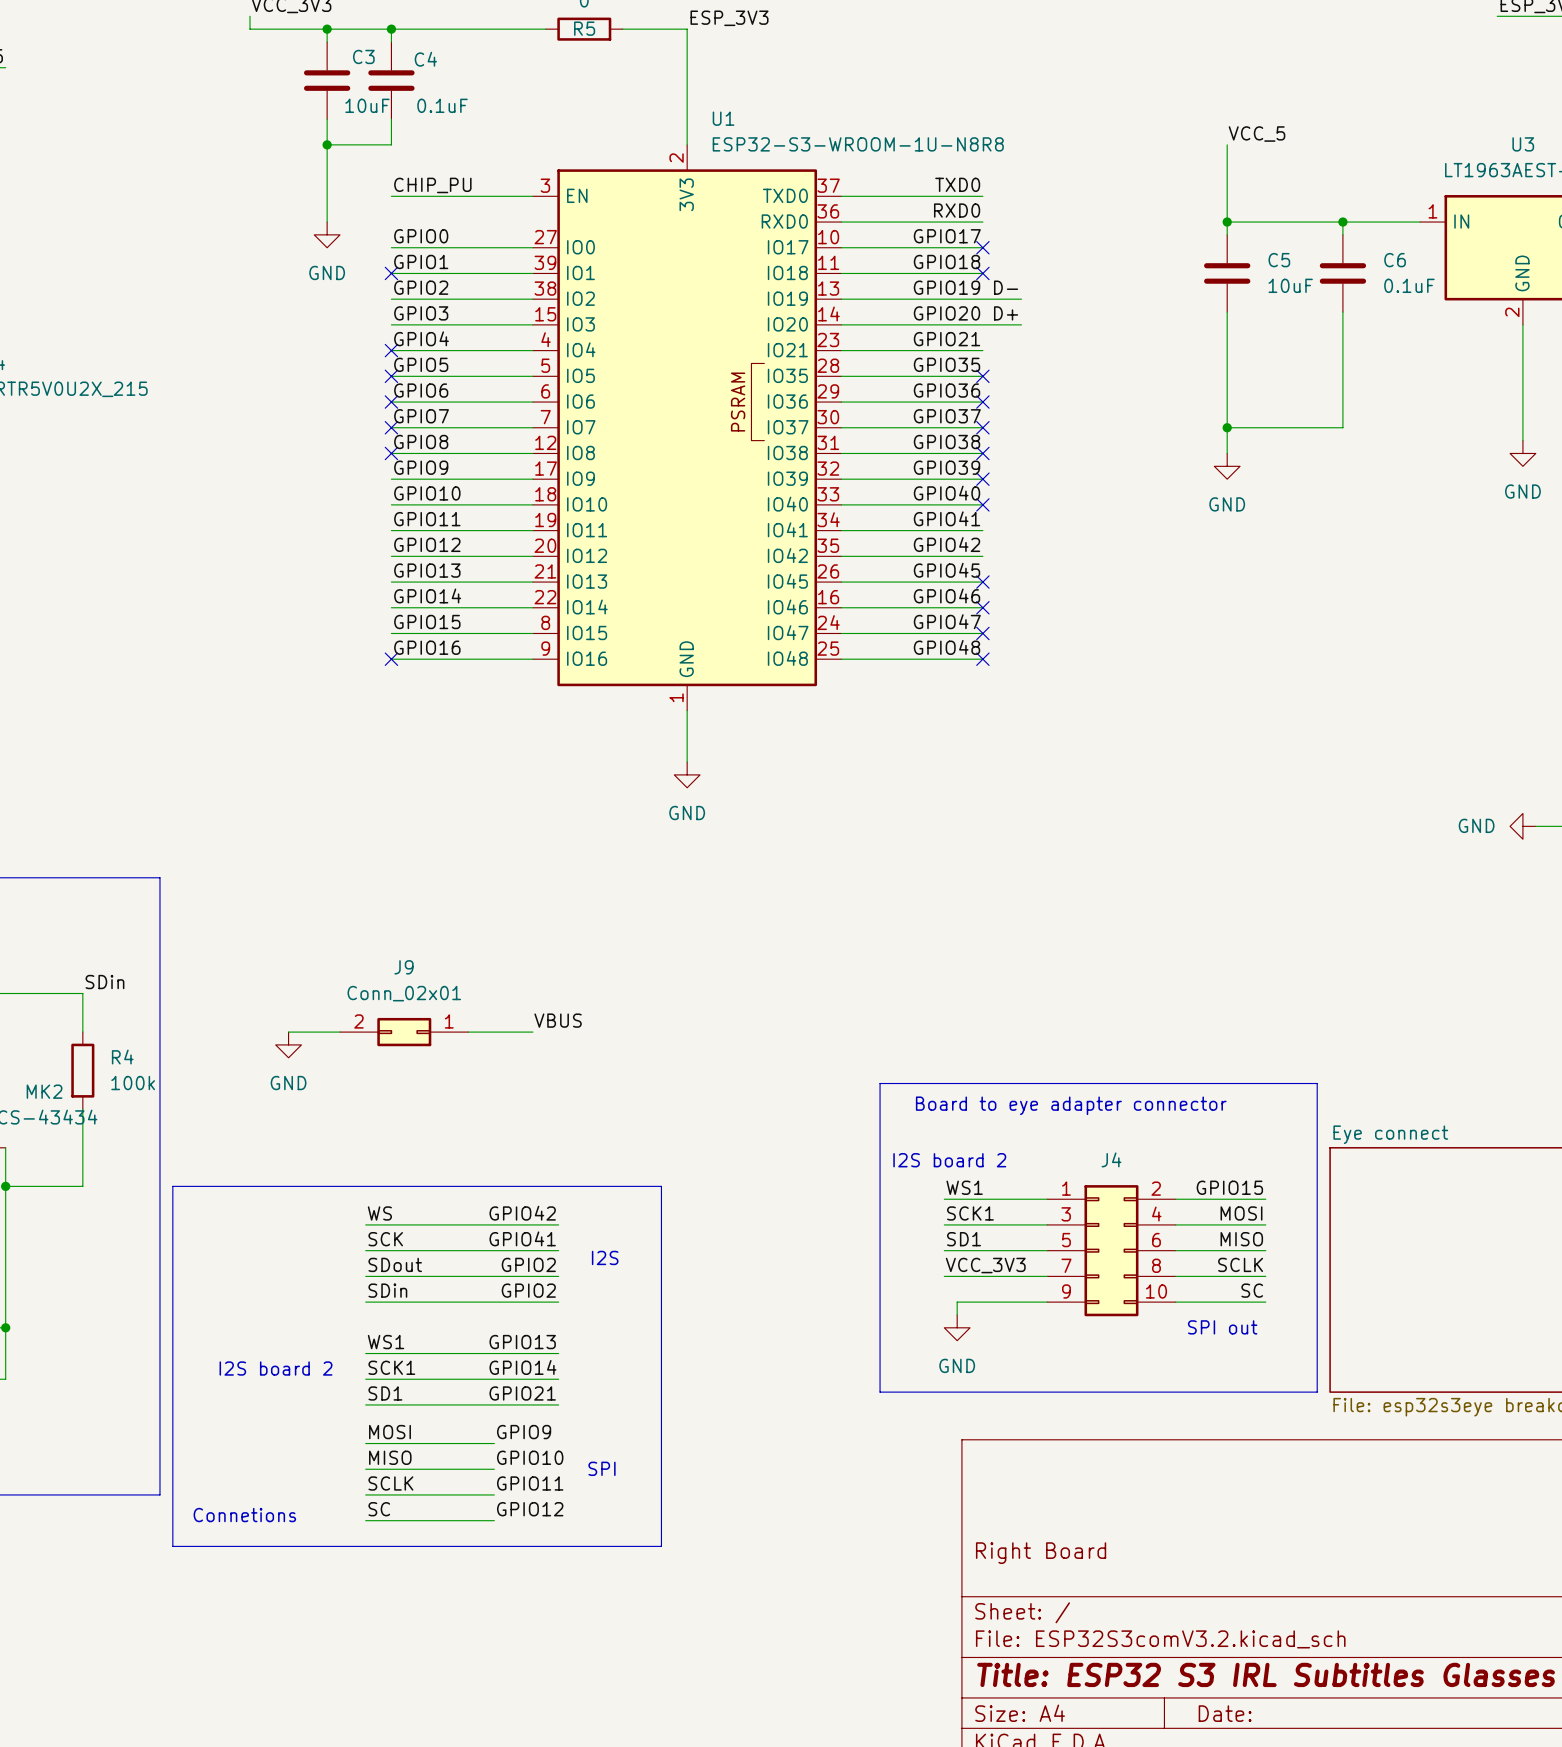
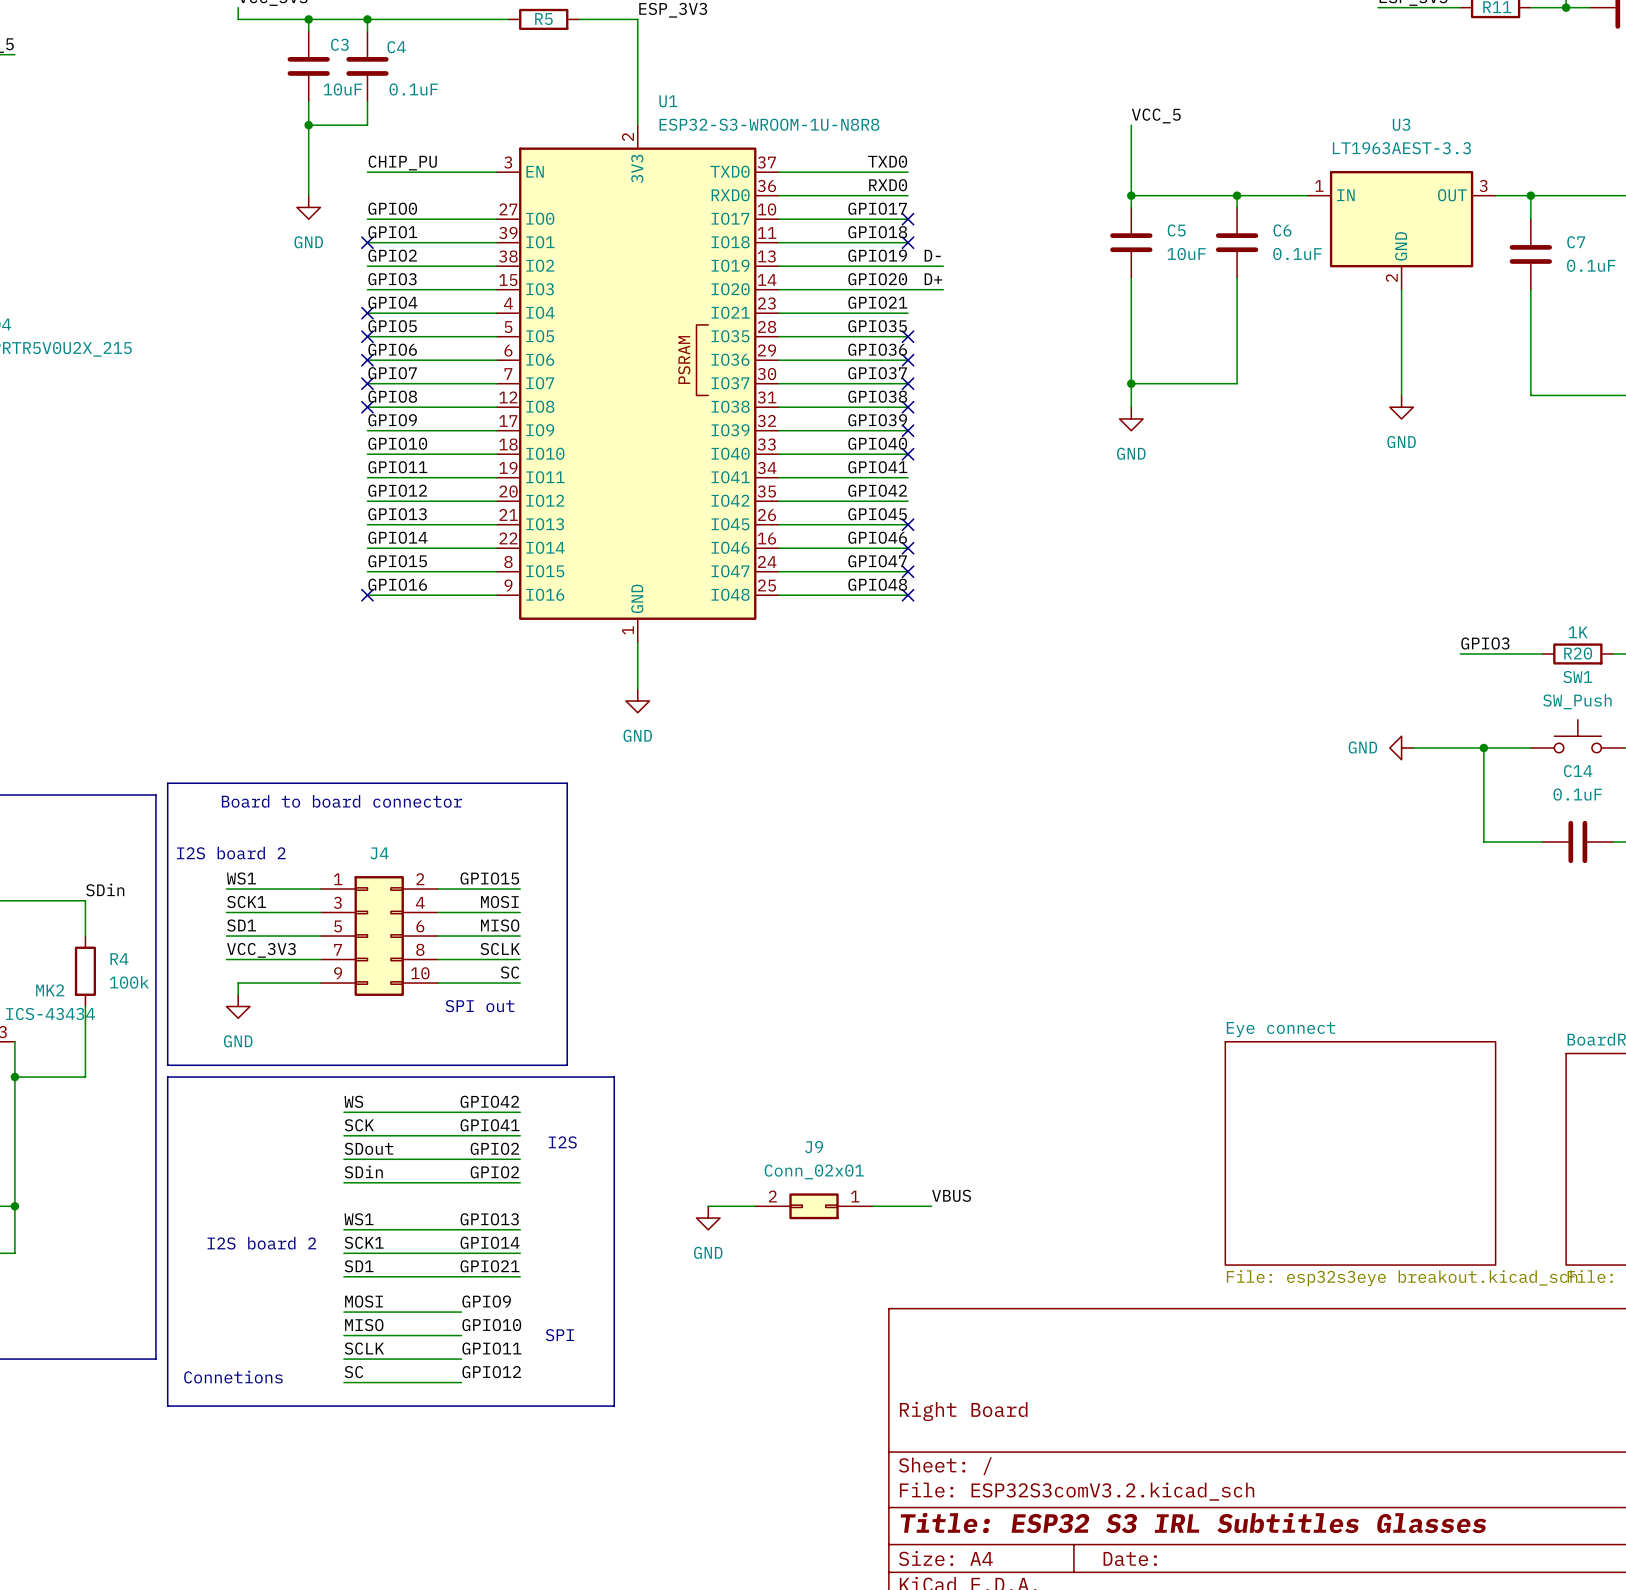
line: none -> (167, 783) (567, 783) (567, 1065) (167, 1065) (167, 783)
text: none -> Board to board connector (342, 801)
text: none -> I2S board 2 (231, 853)
label: none -> WS1 (241, 878)
label: none -> GPIO15 (489, 878)
wire: none -> (226, 889) (320, 889)
wire: none -> (437, 889) (520, 889)
label: none -> SCK1 (246, 902)
label: none -> MOSI (499, 902)
wire: none -> (226, 912) (320, 912)
wire: none -> (437, 912) (520, 912)
label: none -> SD1 (241, 925)
label: none -> MISO (500, 925)
label: VBUS (558, 1020) -> none
wire: none -> (226, 936) (273, 936)
J9 position: (404, 1032) -> (814, 1206)
wire: none -> (496, 936) (520, 936)
power symbol position: GND (288, 1044) -> GND (238, 1006)
label: none -> VCC_3V3 (261, 950)
label: none -> SCLK (500, 949)
wire: none -> (226, 959) (320, 959)
wire: none -> (437, 959) (520, 959)
label: none -> SC (509, 972)
wire: none -> (320, 983) (238, 983) (238, 994)
wire: none -> (437, 983) (520, 983)
line: (880, 1083) (1317, 1083) (1317, 1392) (880, 1392) (880, 1083) -> none
text: Board to eye adapter connector (1071, 1105) -> none
text: none -> SPI out (480, 1006)
text: I2S board 2 (949, 1160) -> none
label: WS1 (964, 1187) -> none
label: GPIO15 (1229, 1187) -> none
wire: (944, 1199) (1047, 1199) -> none
wire: (1175, 1199) (1265, 1199) -> none
label: SCK1 (970, 1213) -> none
label: MOSI (1241, 1213) -> none
wire: (944, 1224) (1047, 1224) -> none
wire: (1175, 1224) (1265, 1224) -> none
label: SD1 (964, 1239) -> none
label: MISO (1241, 1239) -> none
wire: (944, 1250) (1047, 1250) -> none
J4 position: (1111, 1250) -> (379, 936)
wire: (1175, 1250) (1265, 1250) -> none
label: SCLK (1240, 1264) -> none
label: VCC_3V3 (985, 1265) -> none
wire: (944, 1276) (1047, 1276) -> none
wire: (1175, 1276) (1265, 1276) -> none
label: SC (1252, 1290) -> none
wire: (1047, 1302) (957, 1302) (957, 1314) -> none
wire: (1175, 1302) (1265, 1302) -> none
label: none -> VBUS (951, 1195)
wire: none -> (708, 1206) (755, 1206)
wire: none -> (872, 1206) (931, 1206)
power symbol position: GND (957, 1327) -> GND (708, 1218)
text: SPI out (1222, 1327) -> none

